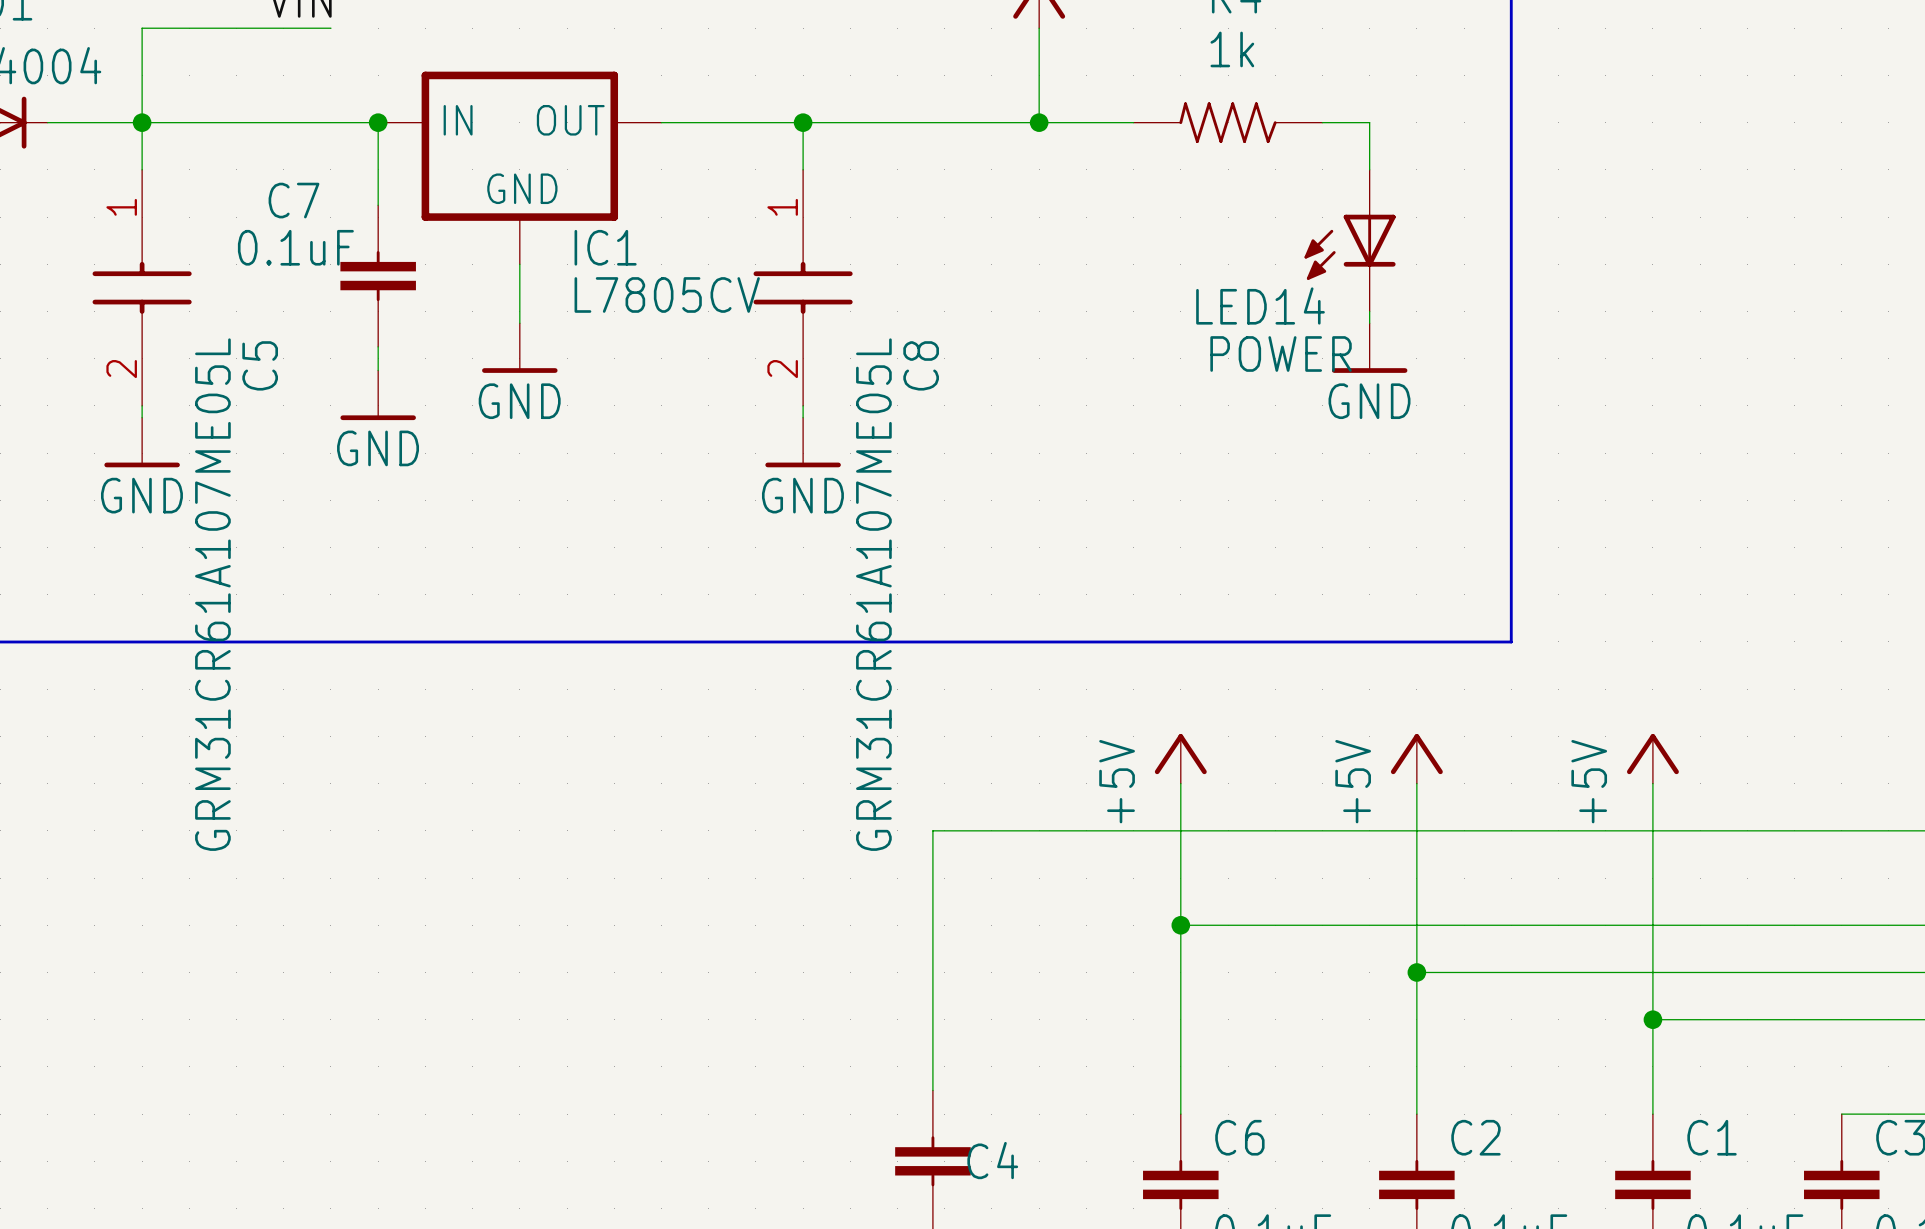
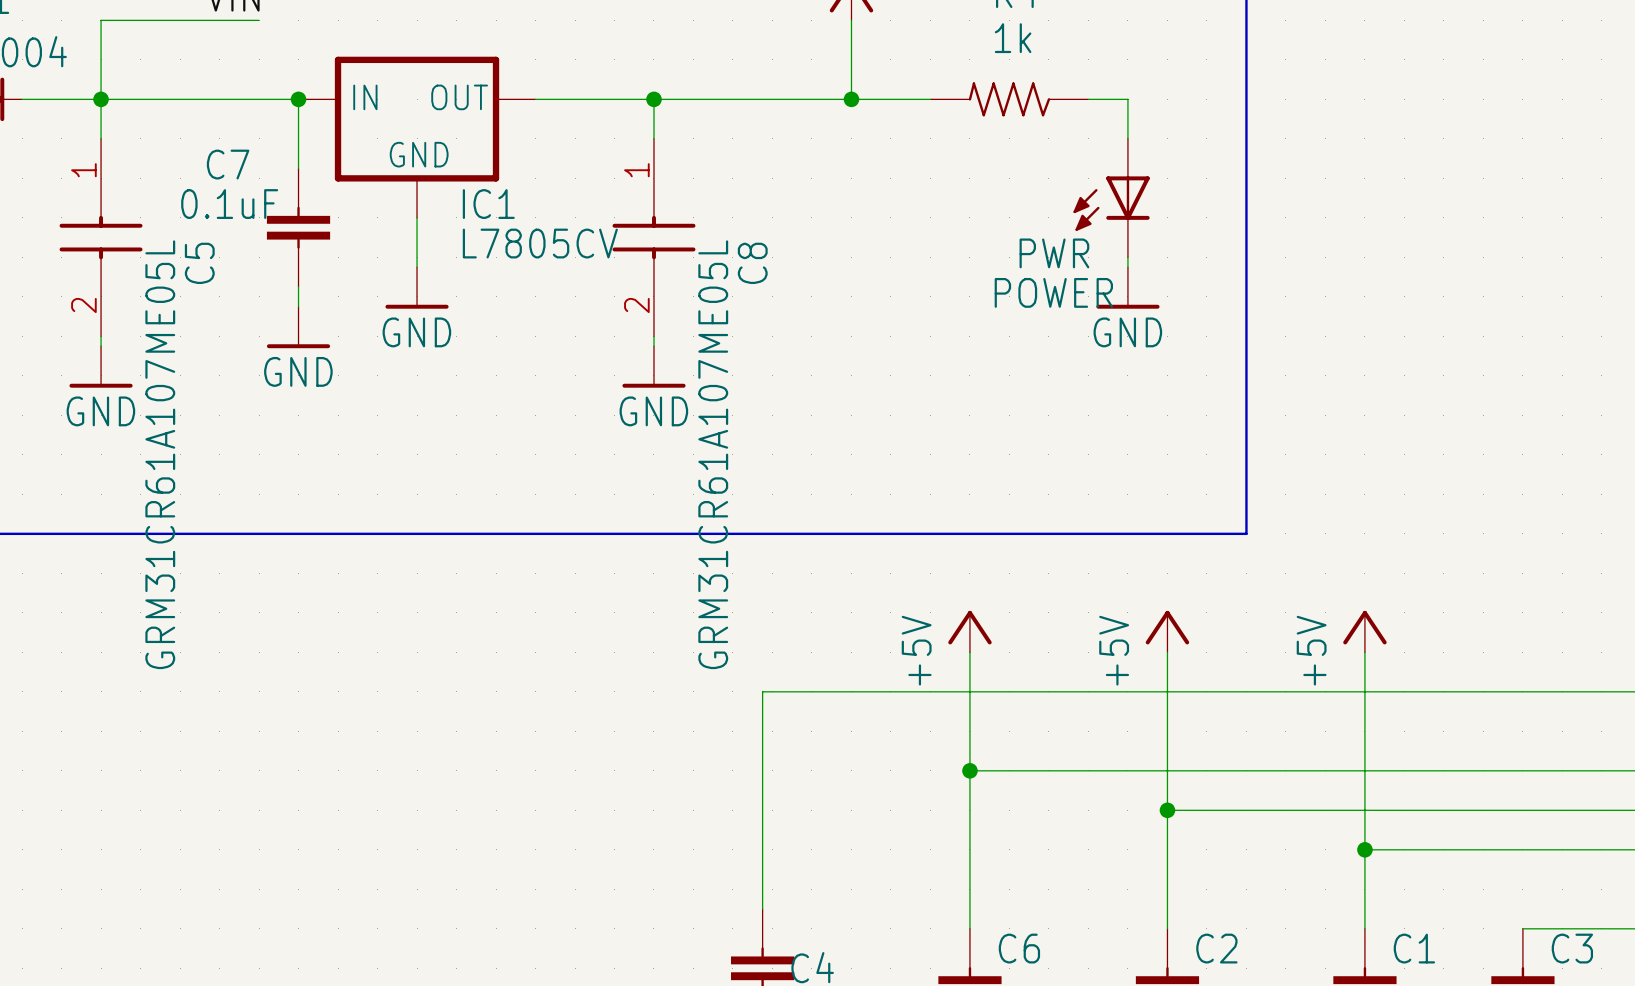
LED14 name: LED14 (1260, 305) -> PWR (1054, 253)
C5 name position: C5 (260, 365) -> C5 (199, 263)
C8 name position: C8 (921, 365) -> C8 (752, 263)
C5 value position: GRM31CR61A107ME05L (212, 594) -> GRM31CR61A107ME05L (160, 454)
C8 value position: GRM31CR61A107ME05L (873, 594) -> GRM31CR61A107ME05L (713, 454)

